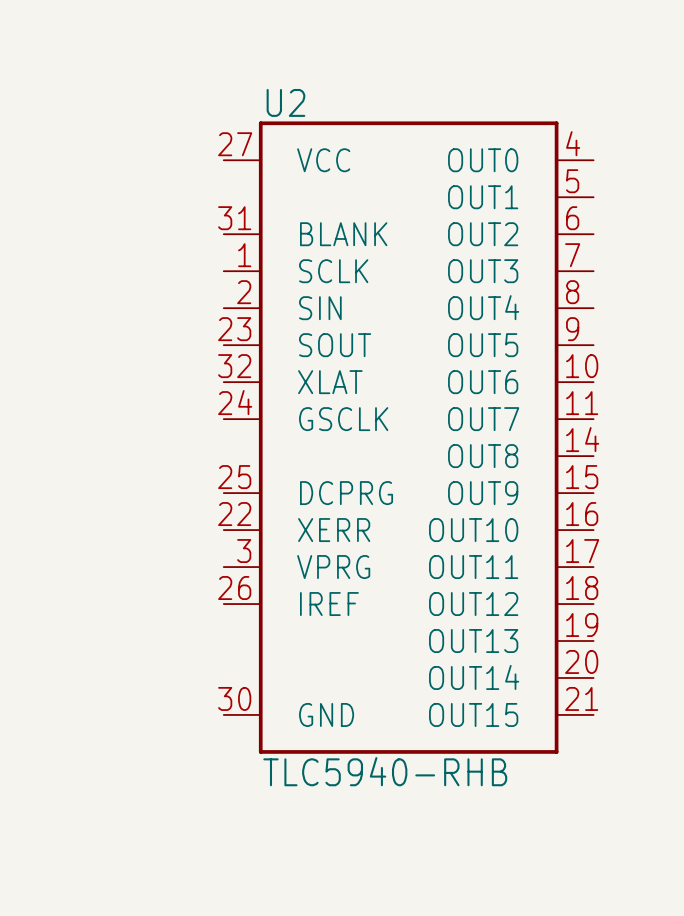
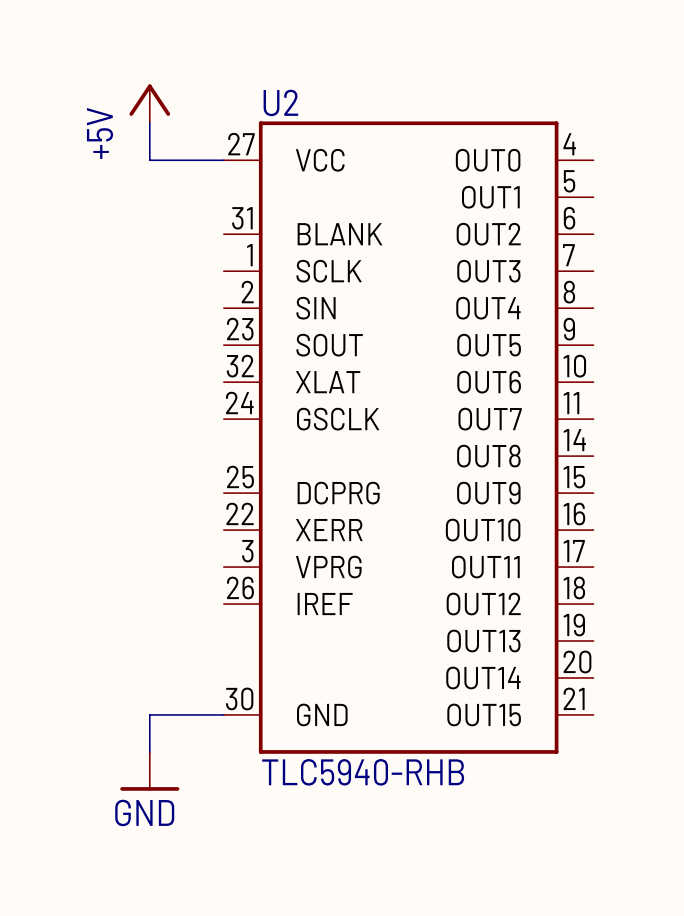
power symbol: none -> +5V (149, 103)
wire: none -> (149, 123) (149, 160) (223, 160)
wire: none -> (223, 714) (149, 714) (149, 751)
power symbol: none -> GND (149, 771)

